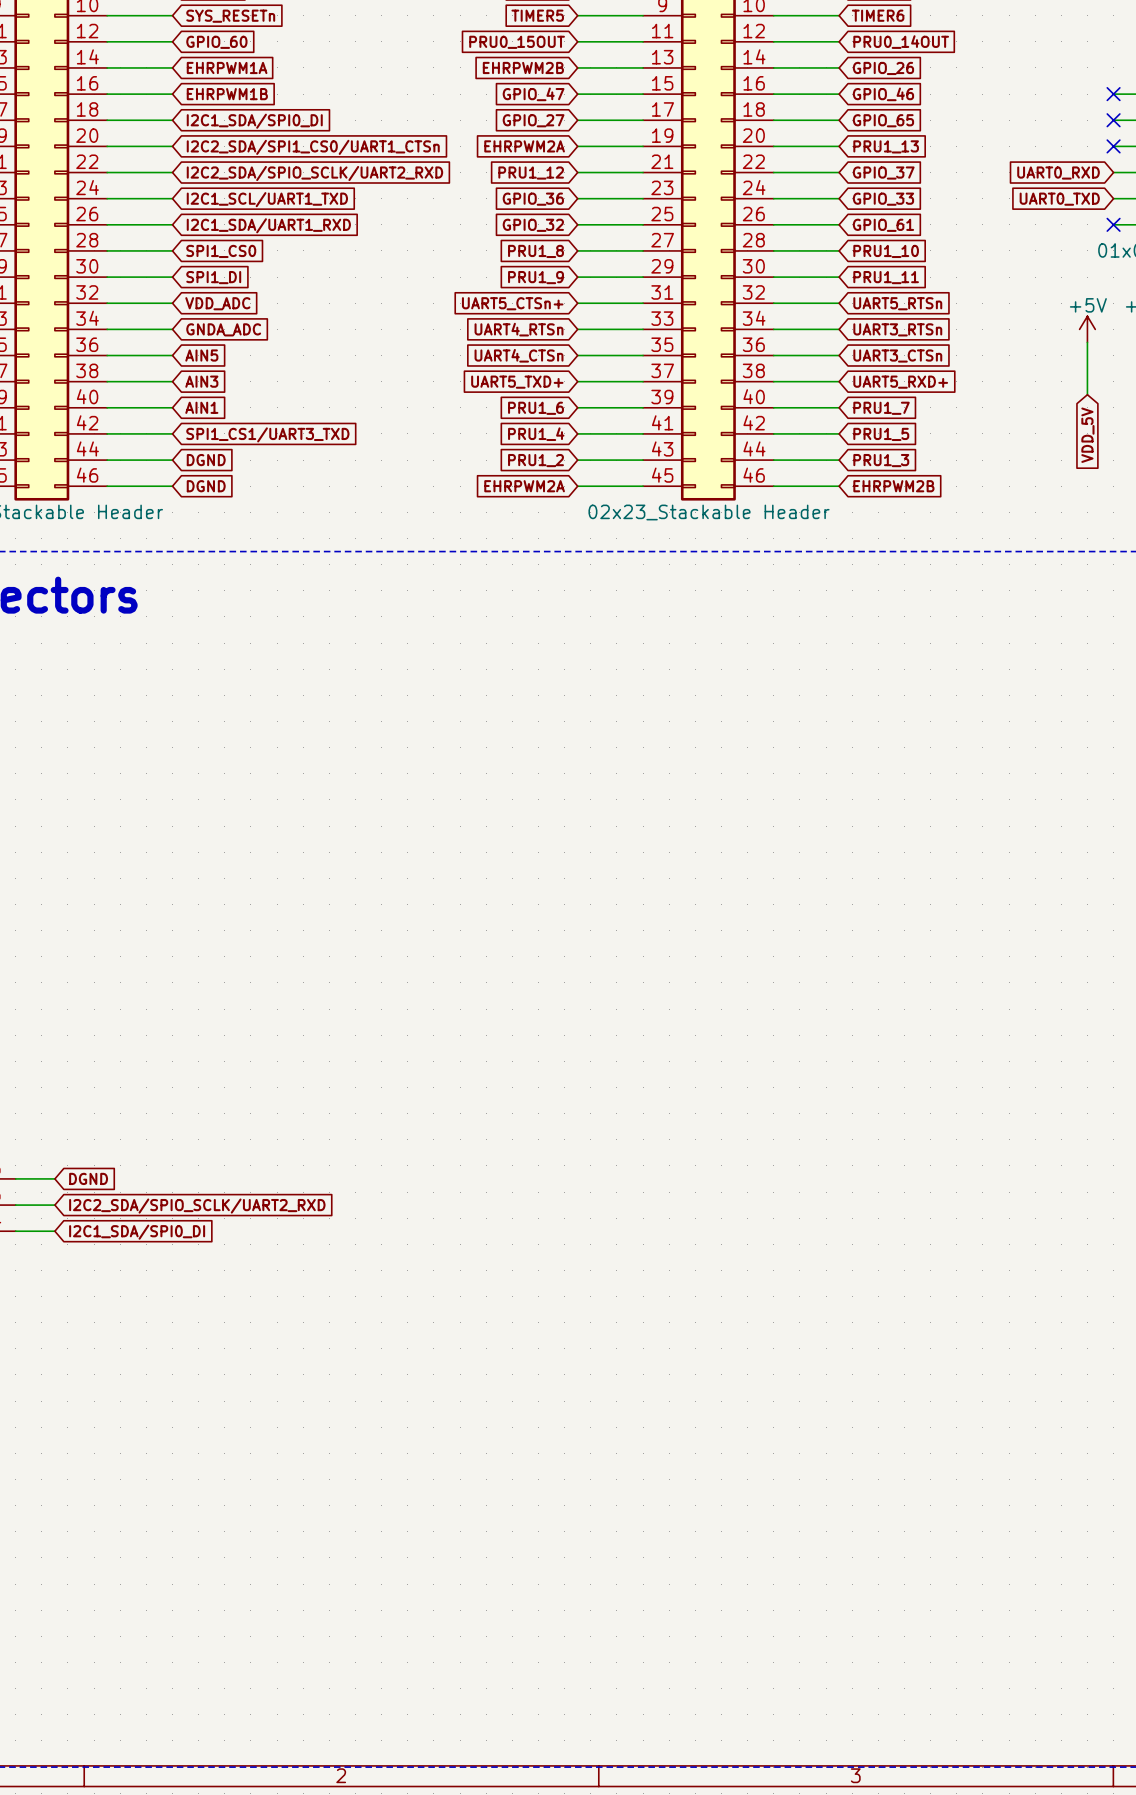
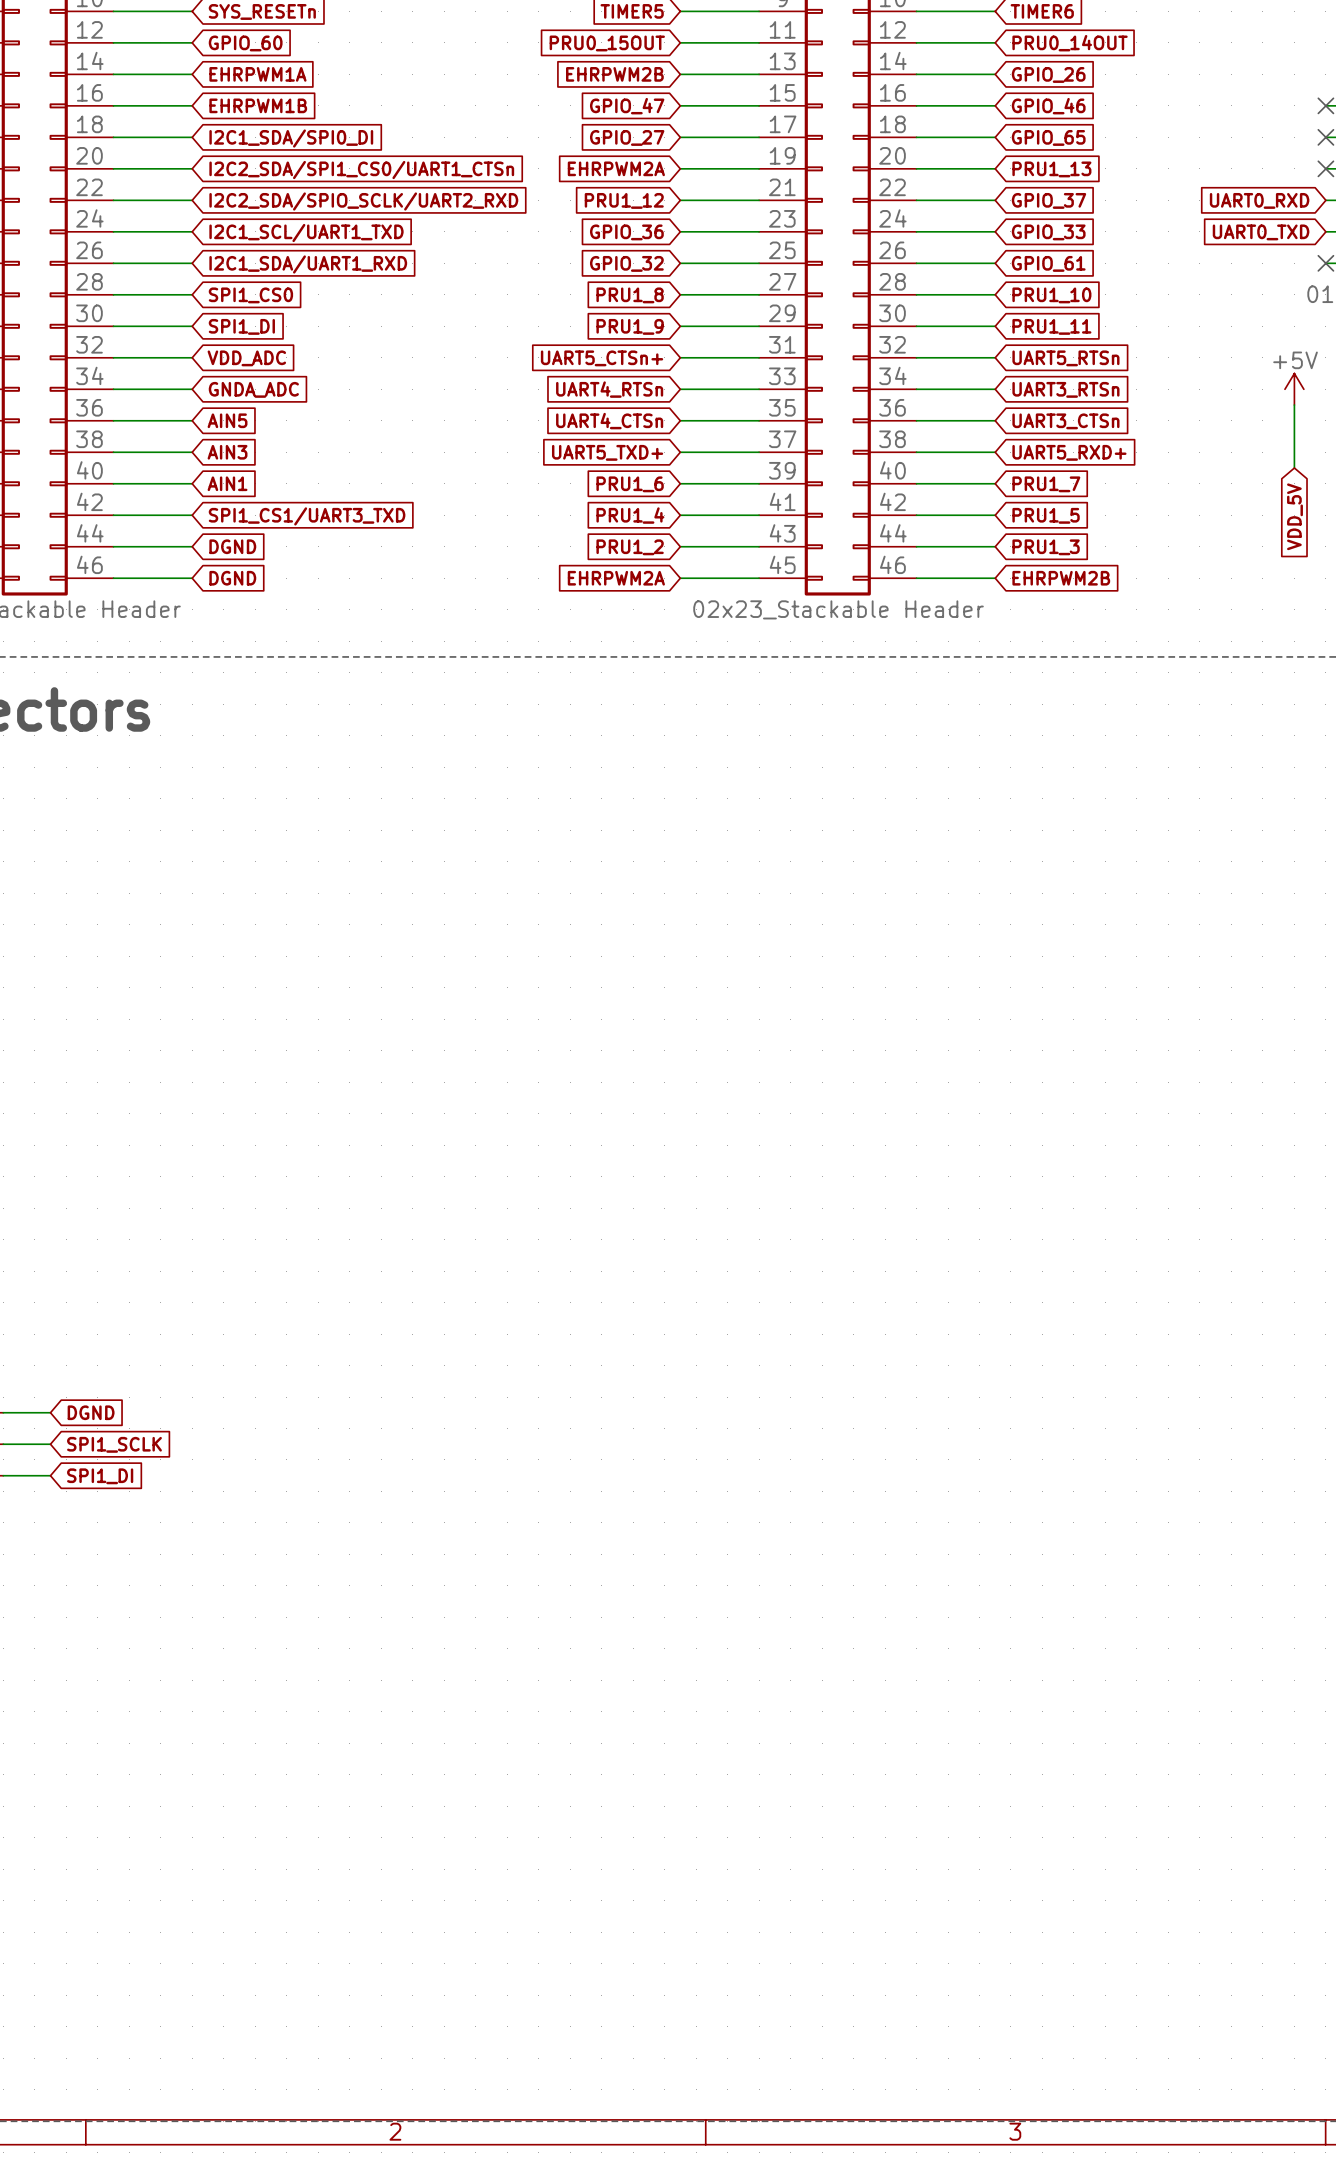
global label: I2C2_SDA/SPIO_SCLK/UART2_RXD (197, 1206) -> SPI1_SCLK (114, 1444)
global label: I2C1_SDA/SPI0_DI (137, 1232) -> SPI1_DI (100, 1476)

